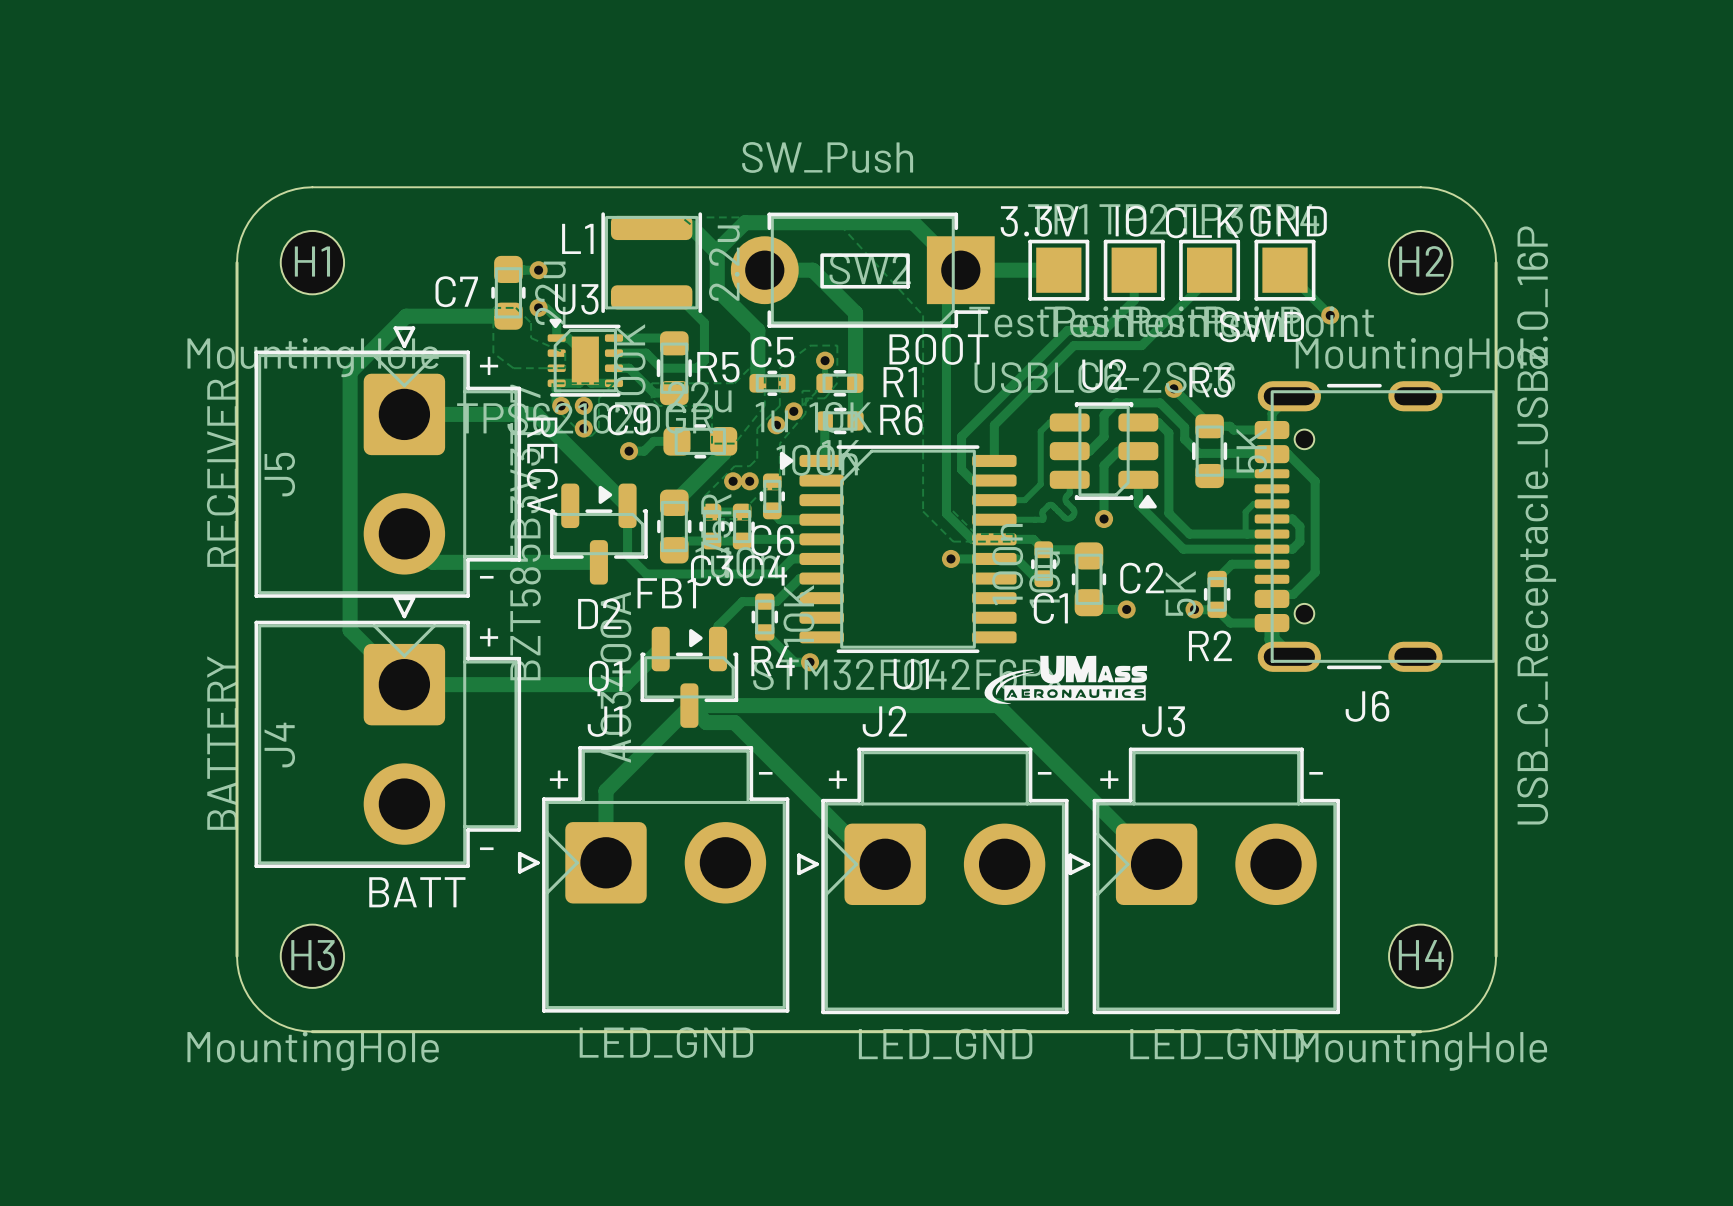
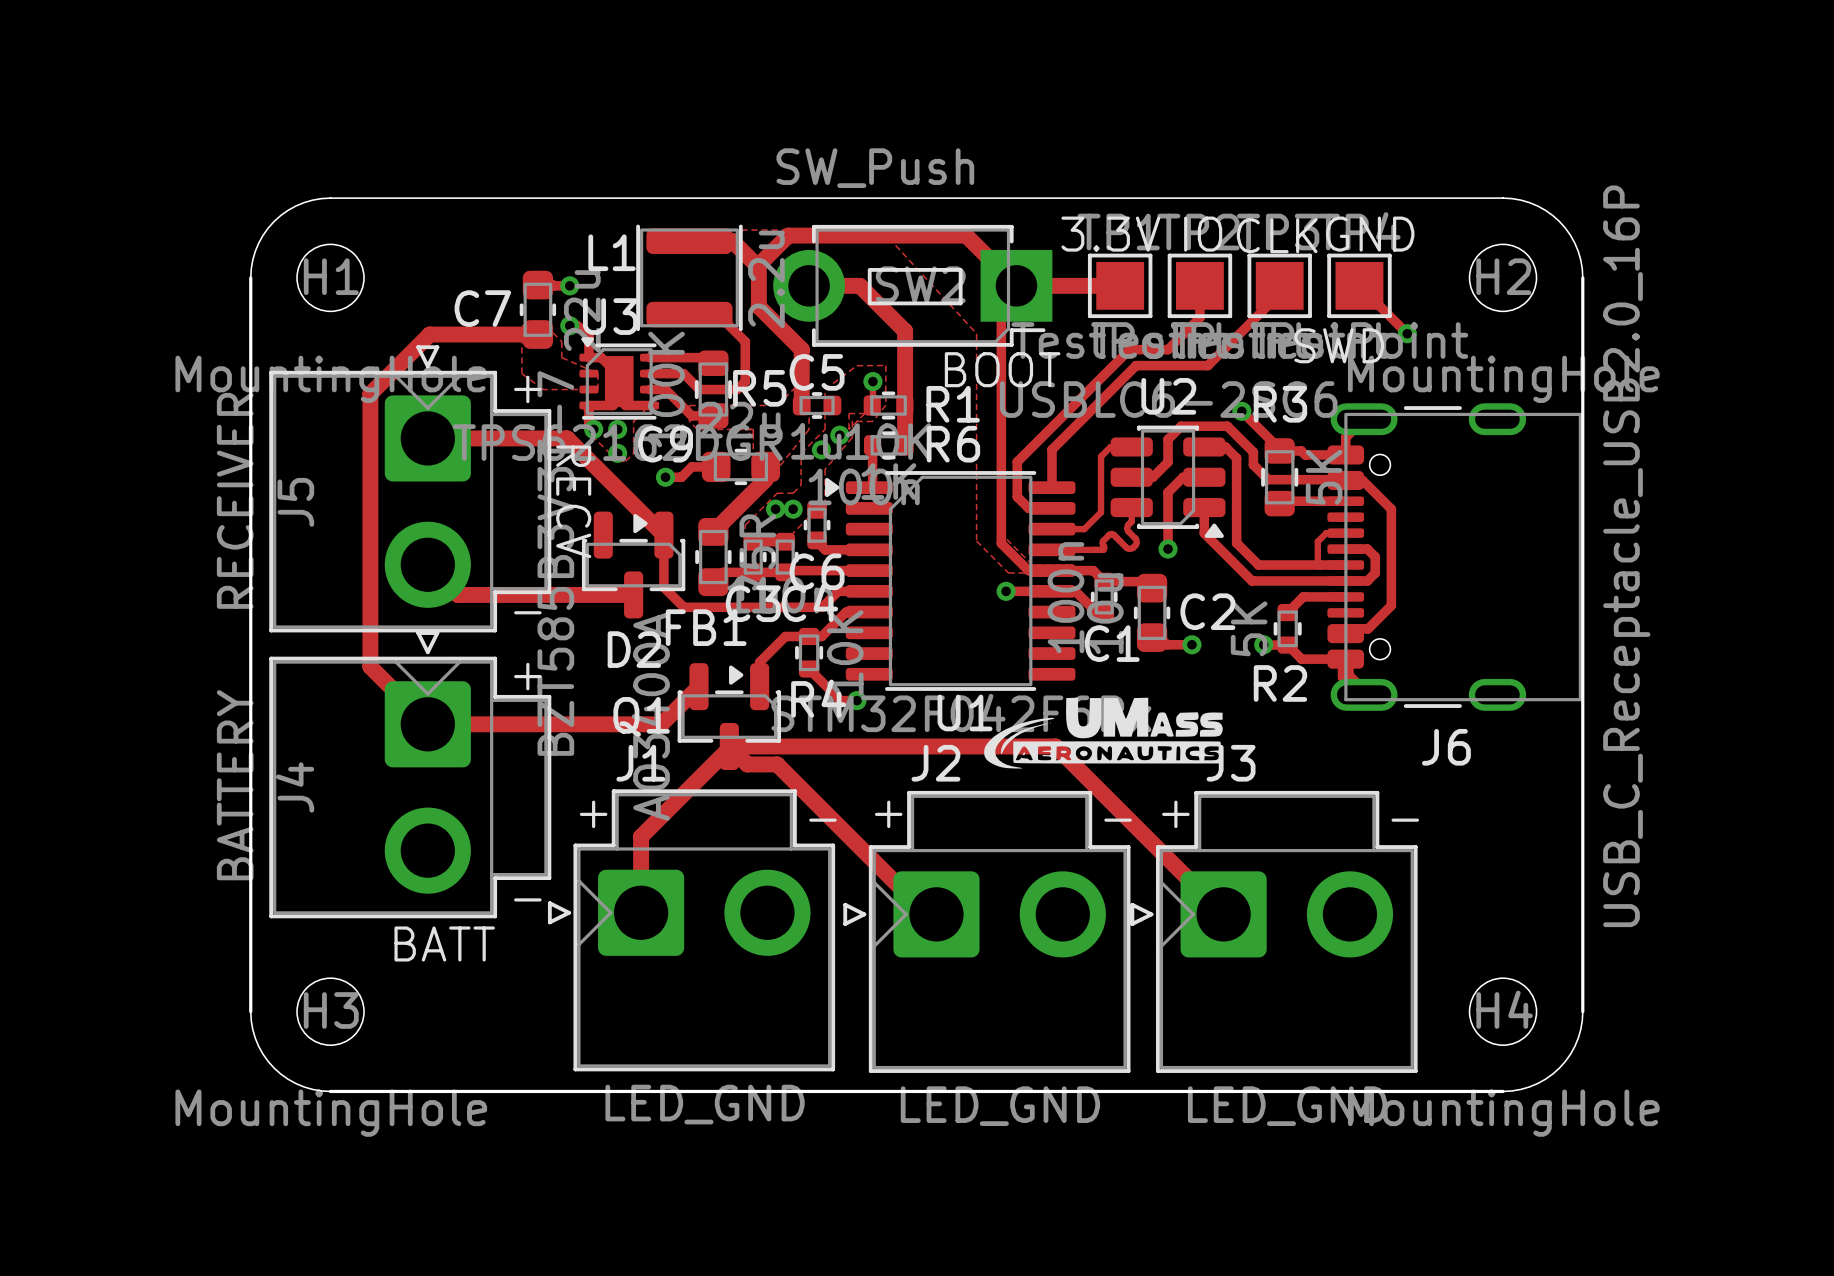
drawing shape: [984, 655, 1148, 704] -> [984, 697, 1223, 769]

